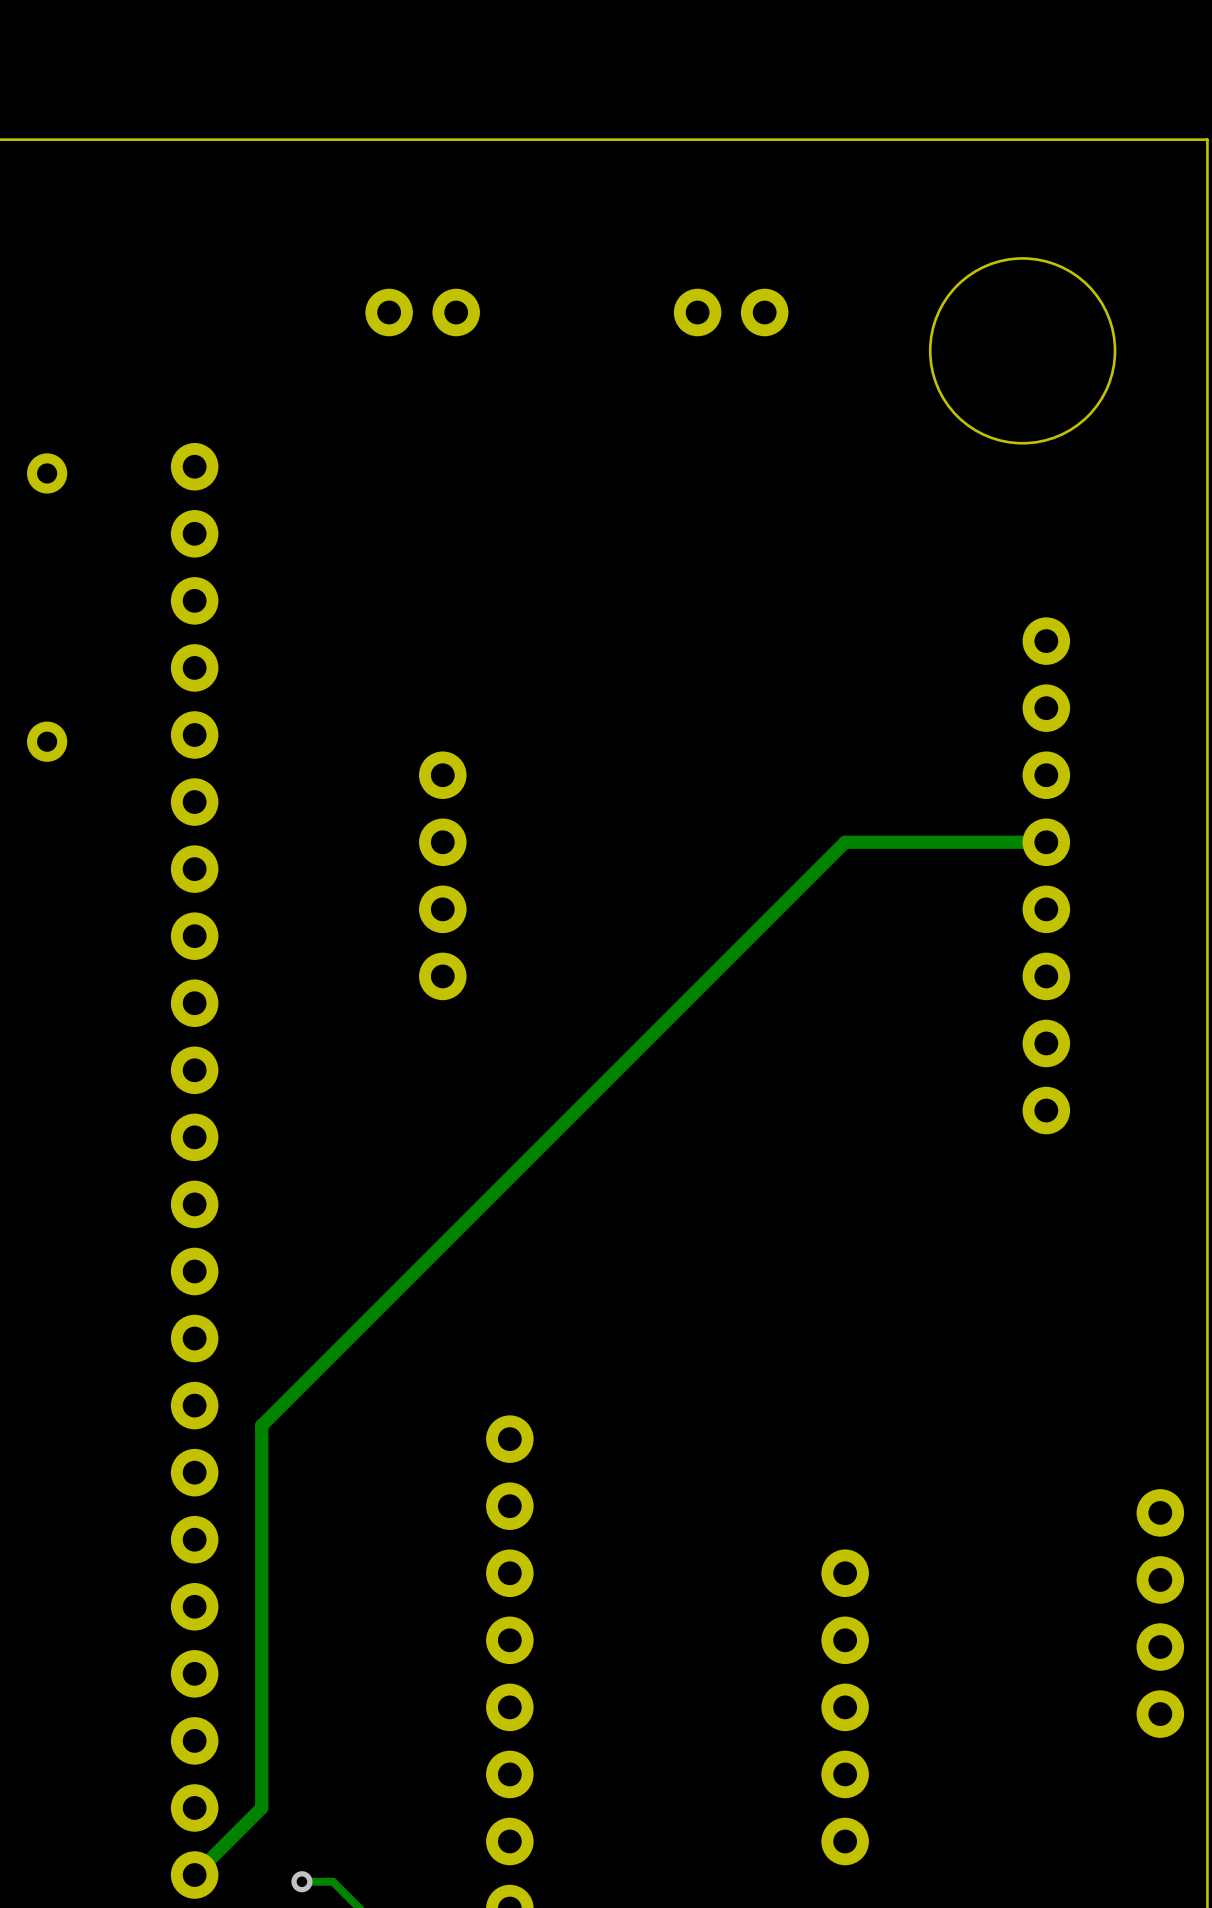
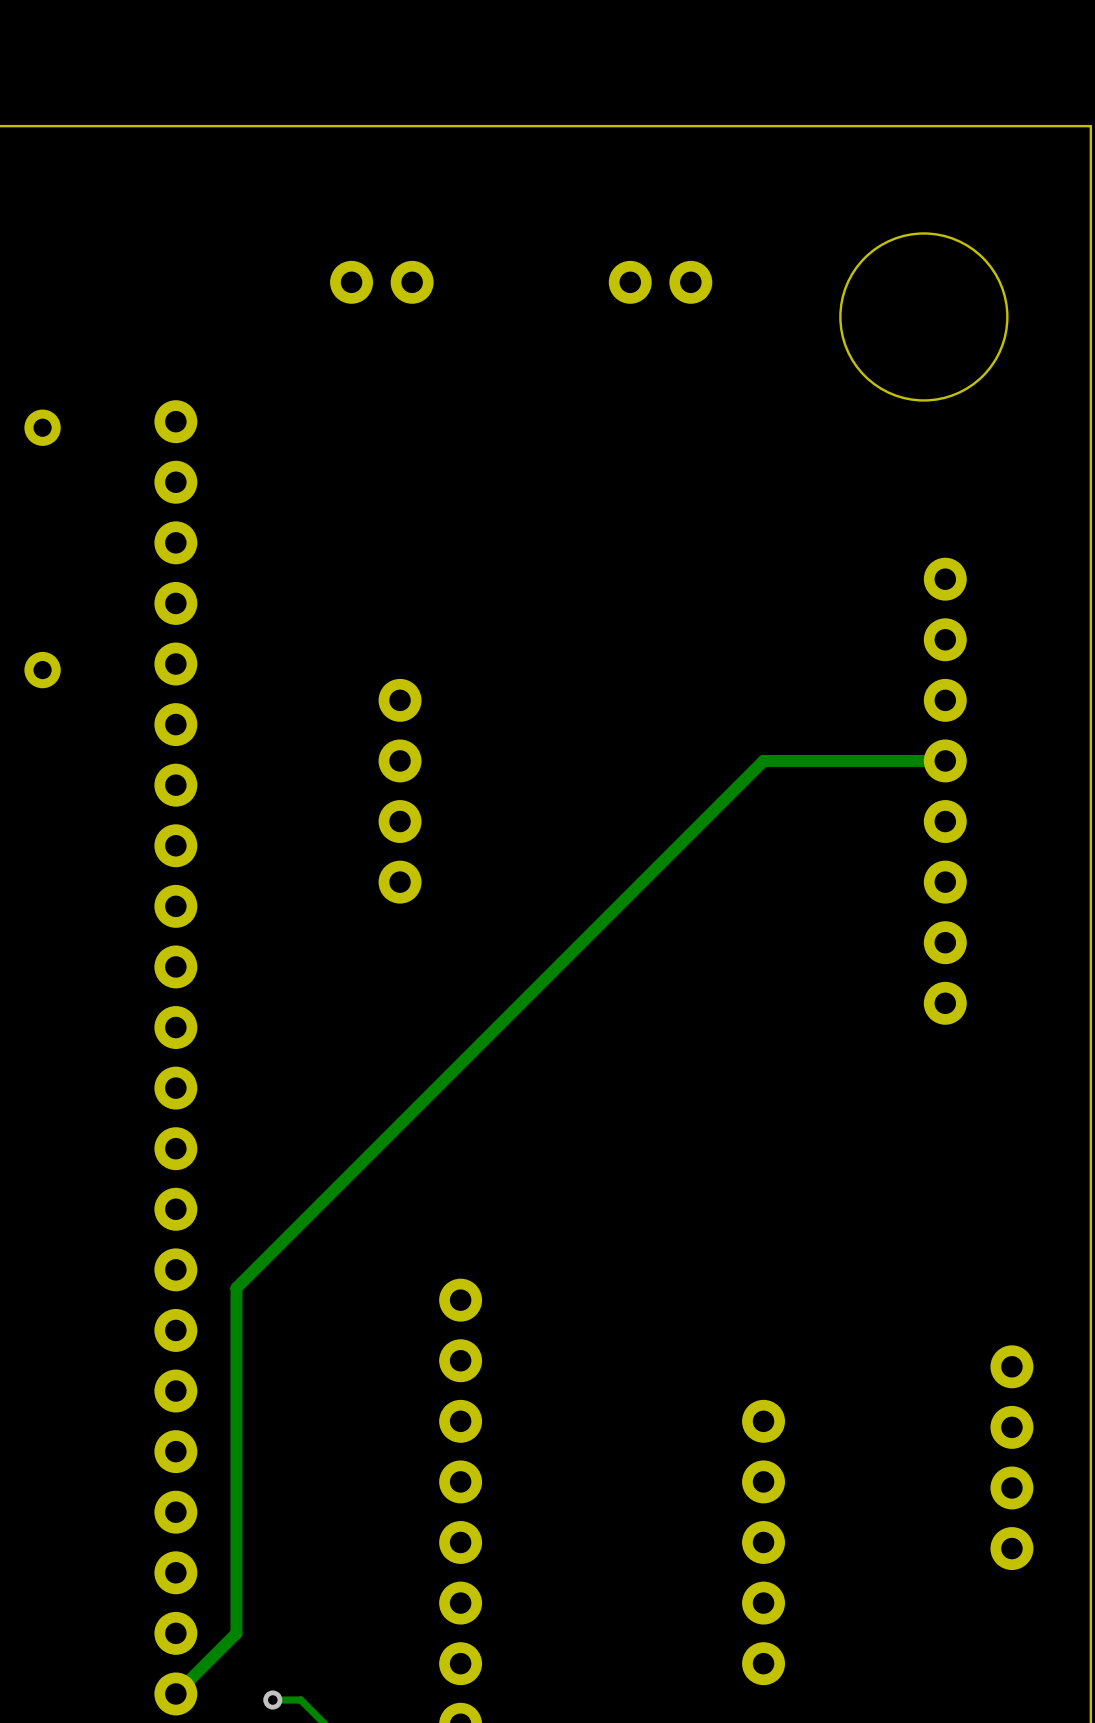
part position: (1160, 1613) -> (1011, 1457)

